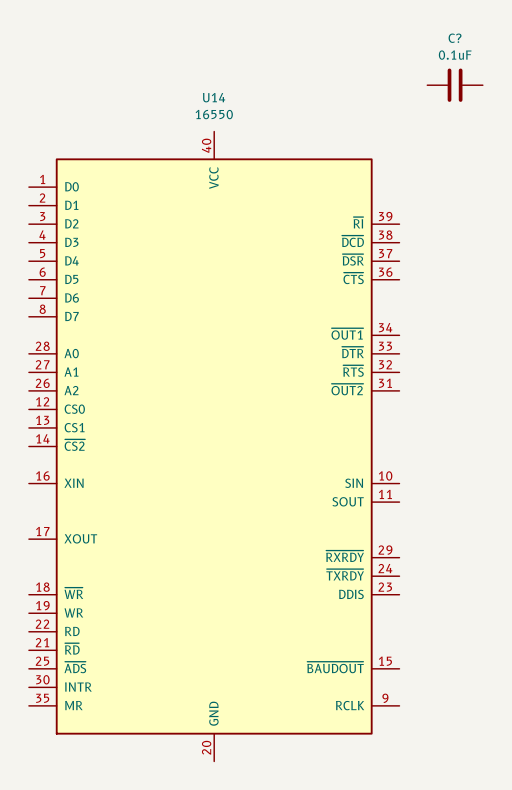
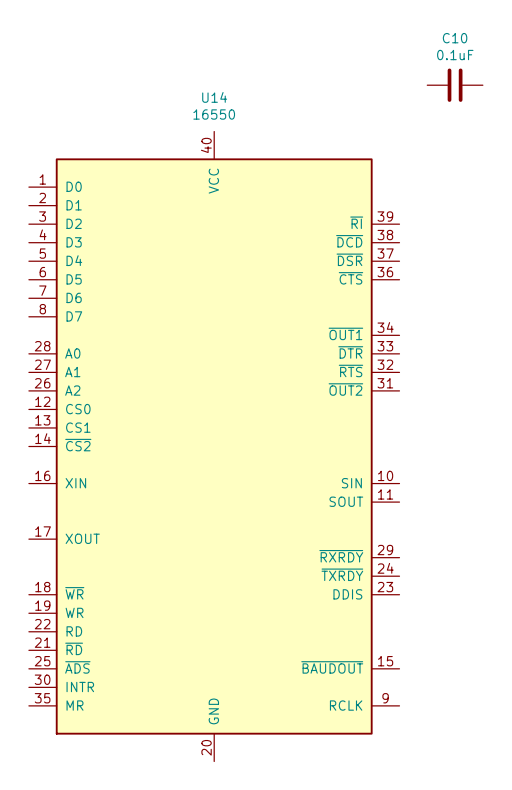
C? name: C? (455, 38) -> C10 (455, 38)

